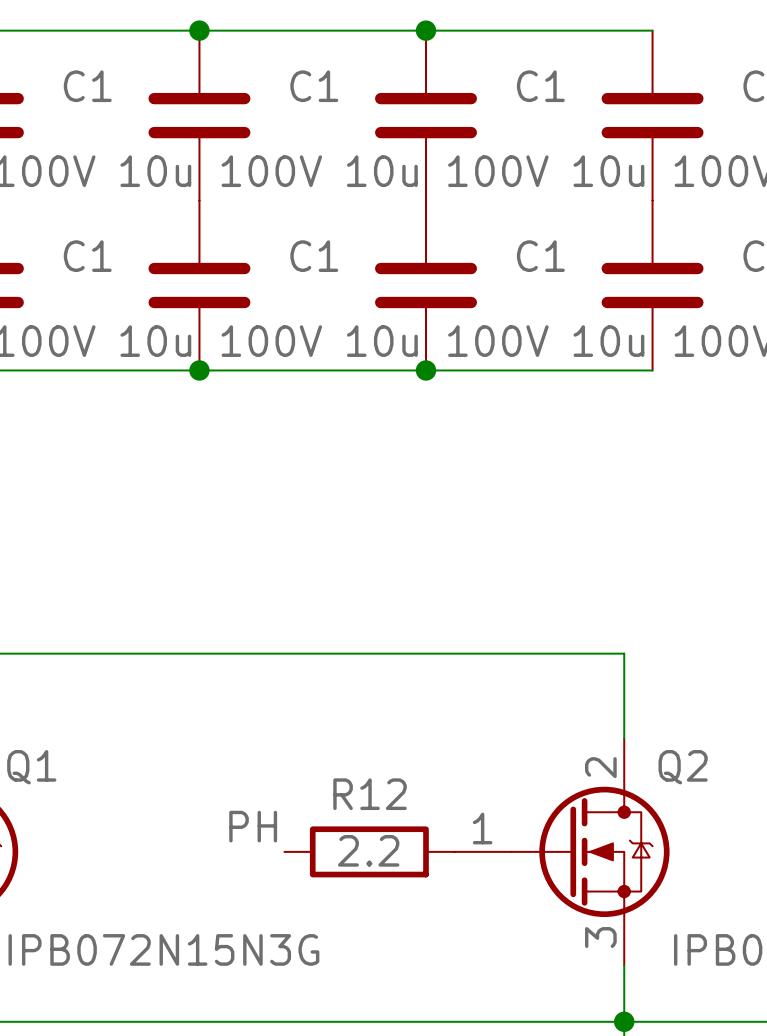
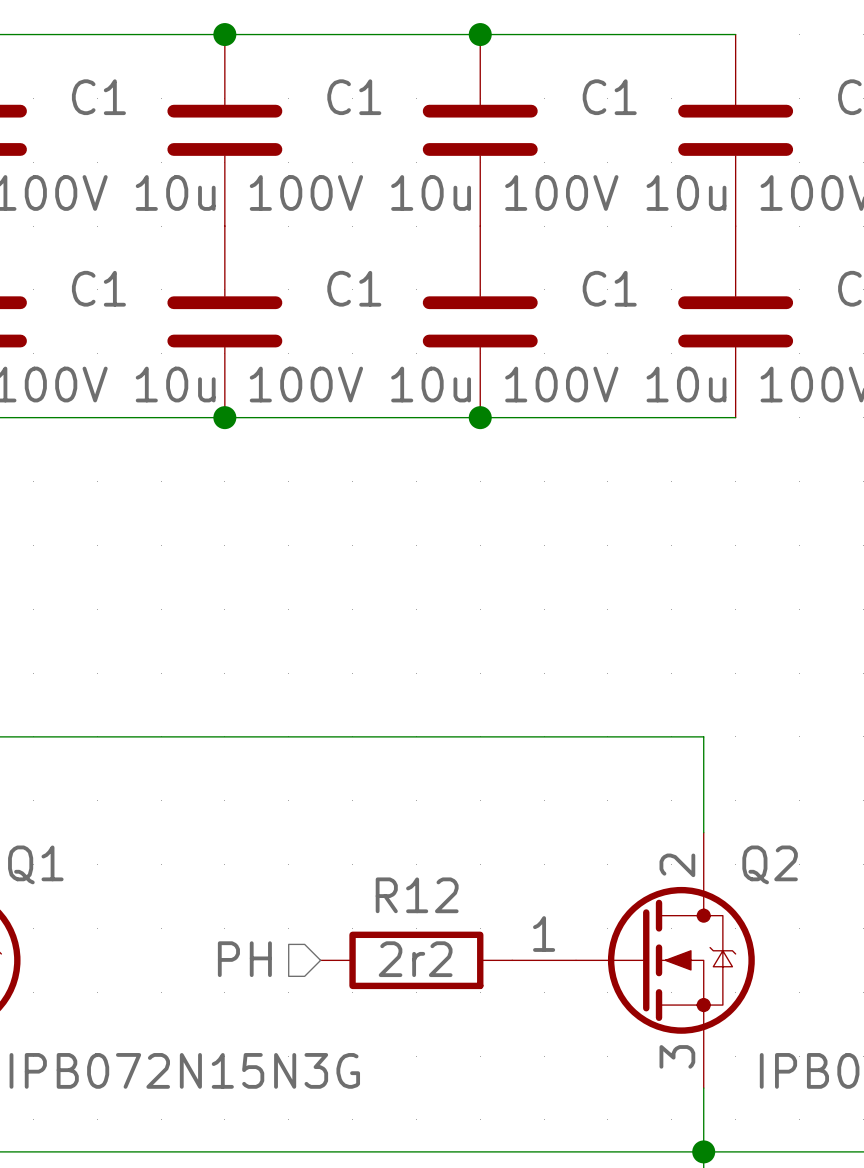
label: PH (253, 826) -> none
hierarchical label: none -> PH (244, 959)
R12 value: 2.2 (368, 850) -> 2r2 (415, 959)

